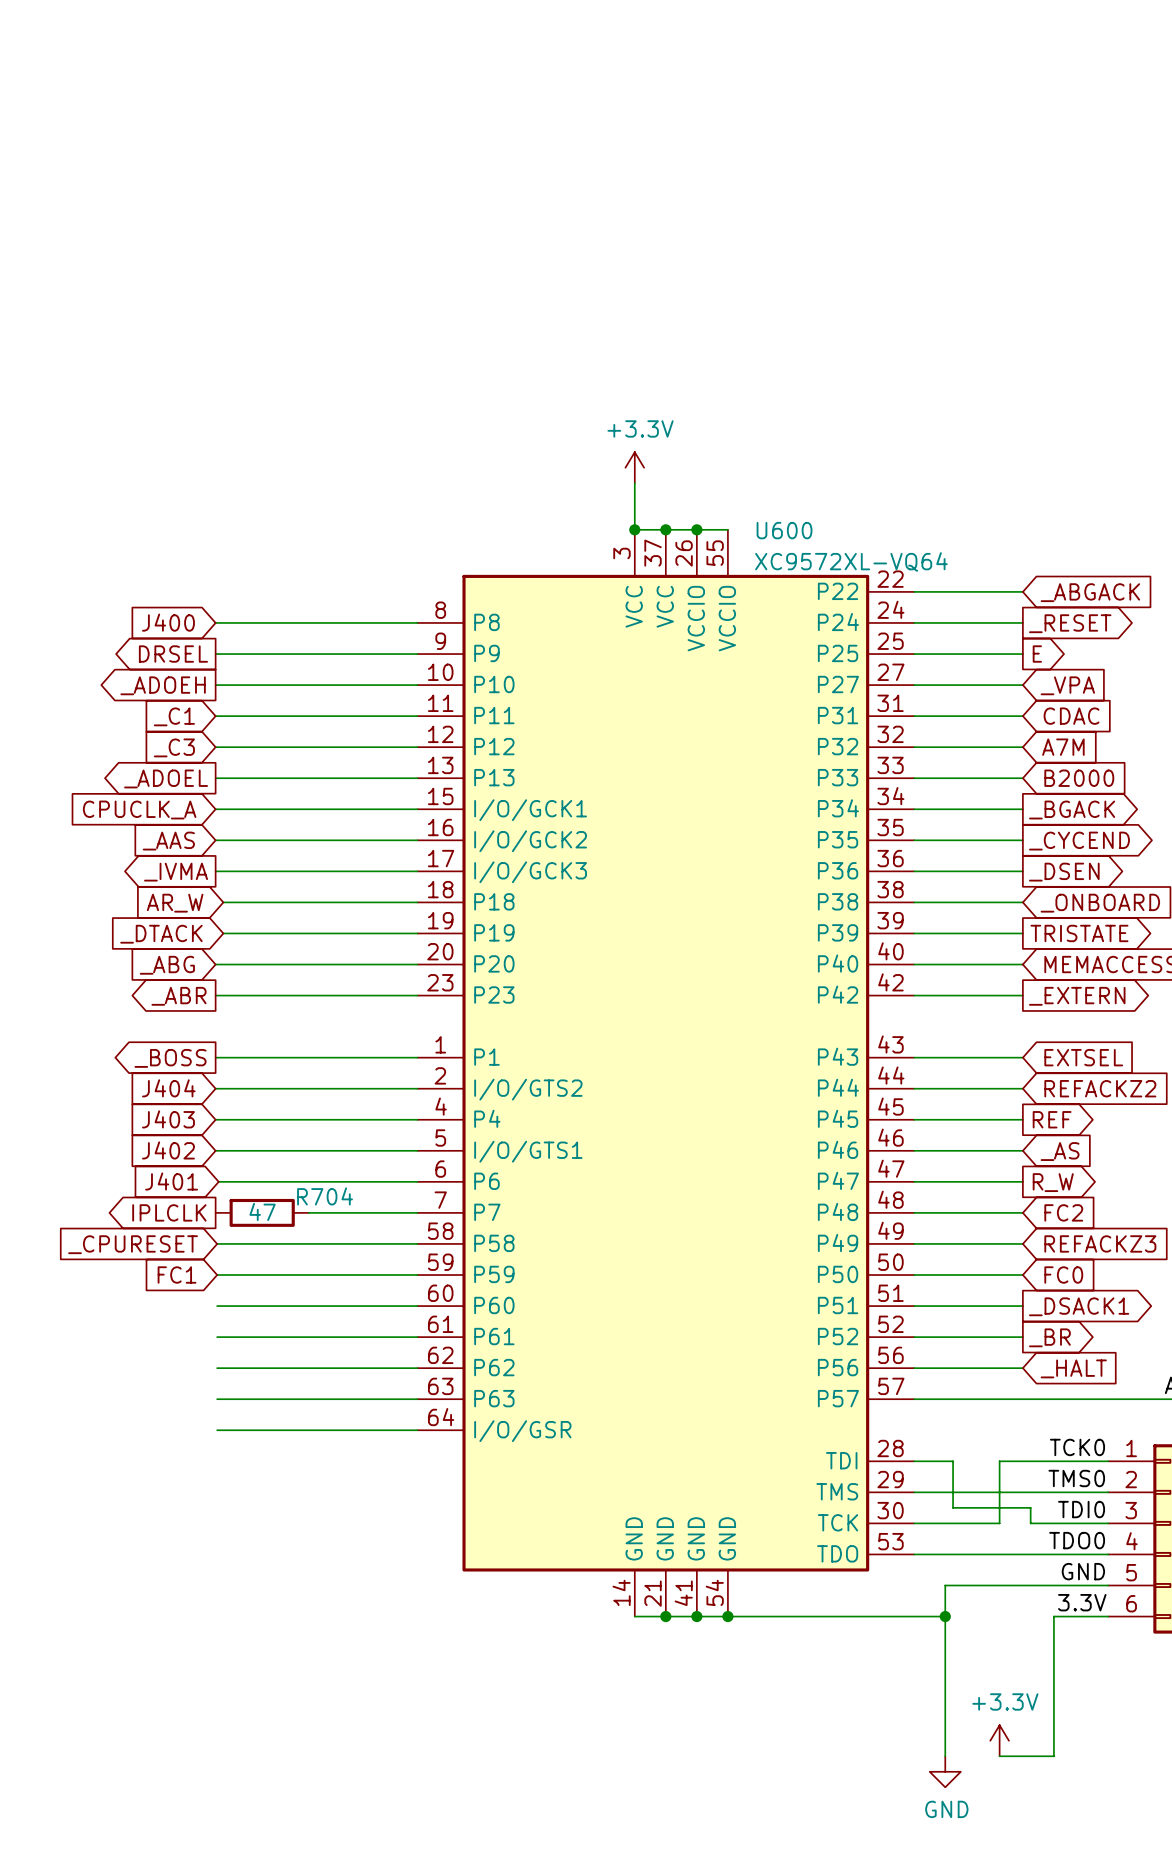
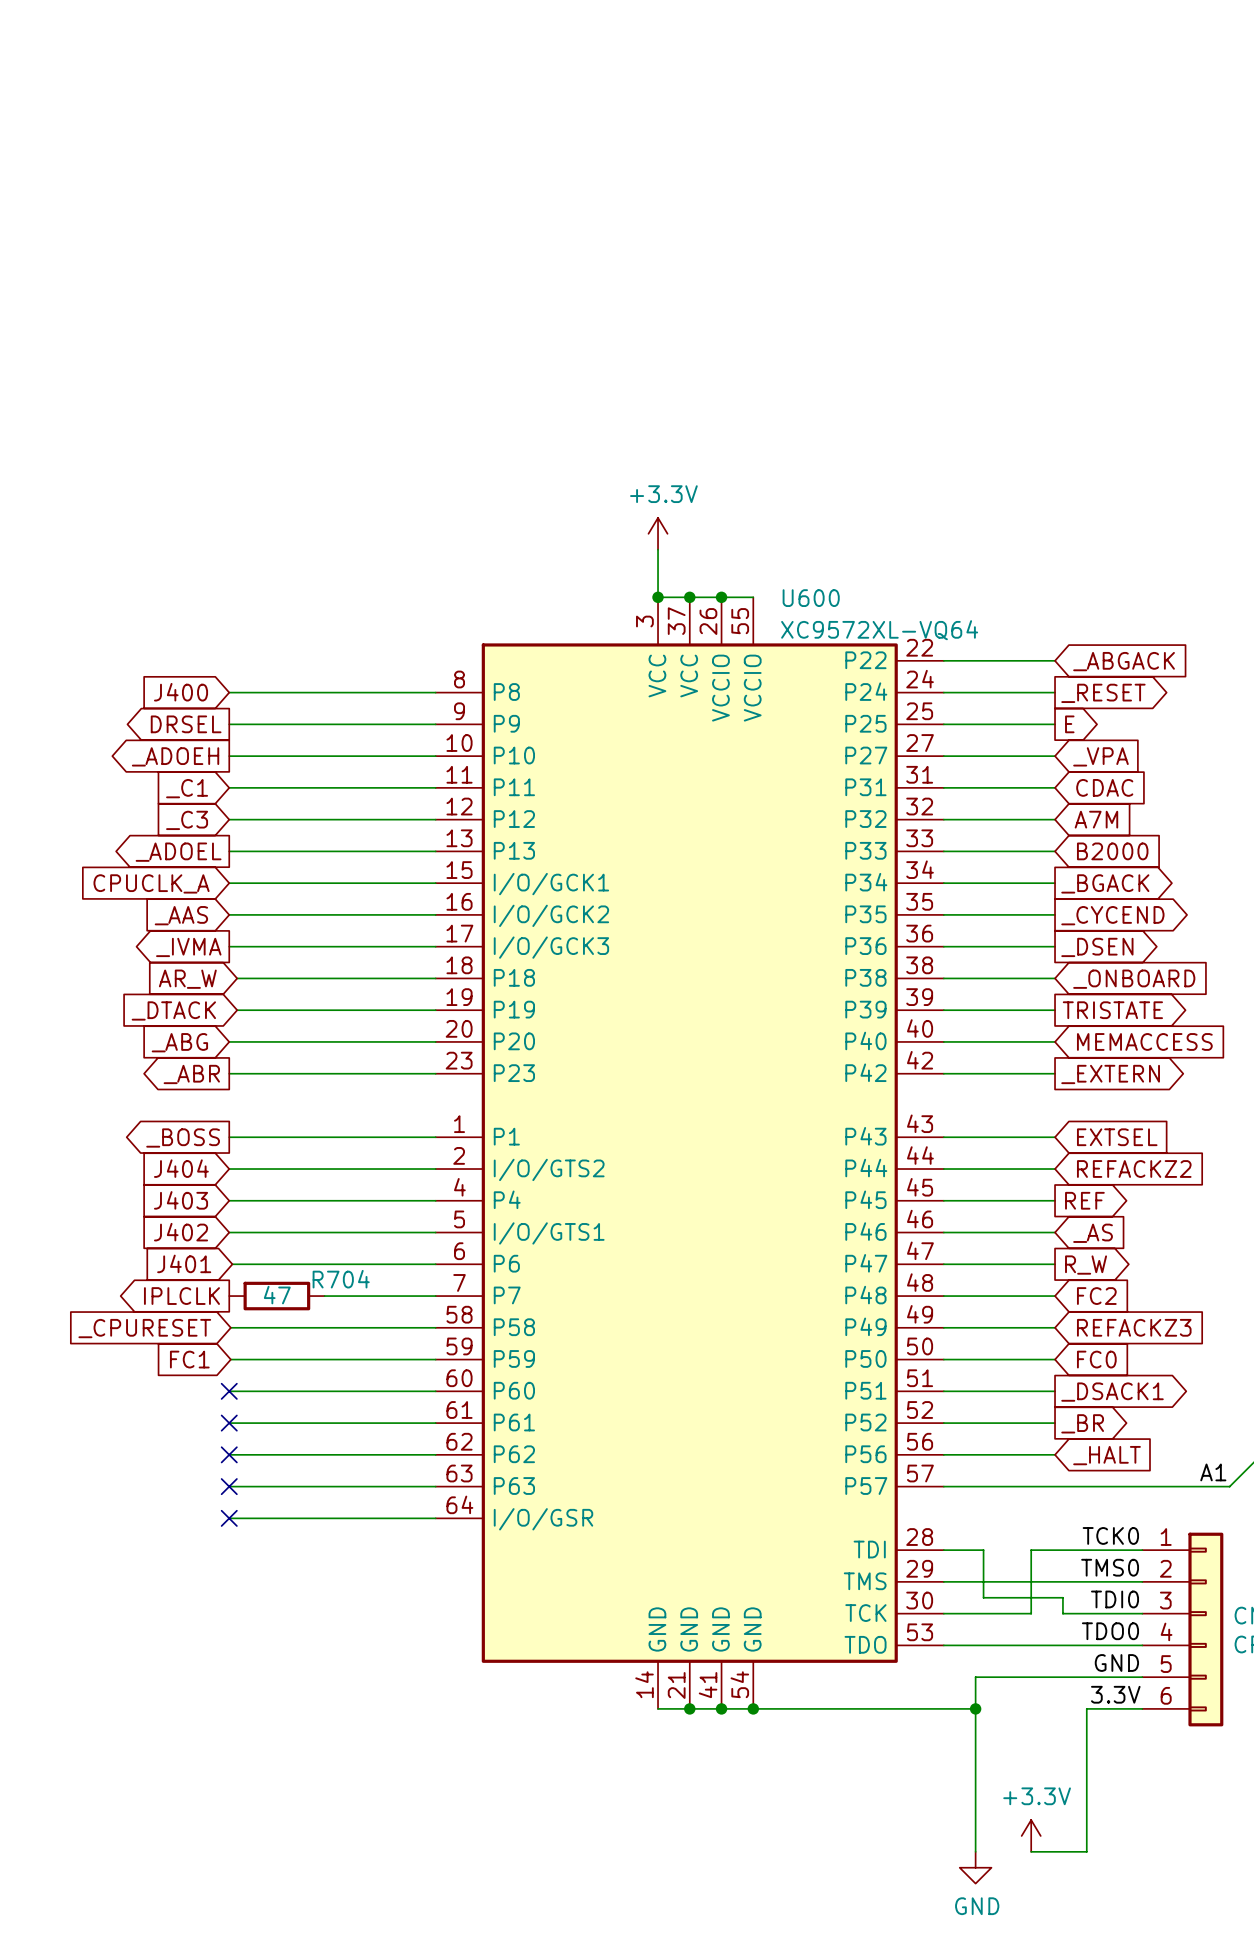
no-connect mark: none -> (229, 1391)
no-connect mark: none -> (229, 1423)
no-connect mark: none -> (229, 1454)
no-connect mark: none -> (229, 1486)
no-connect mark: none -> (229, 1518)

